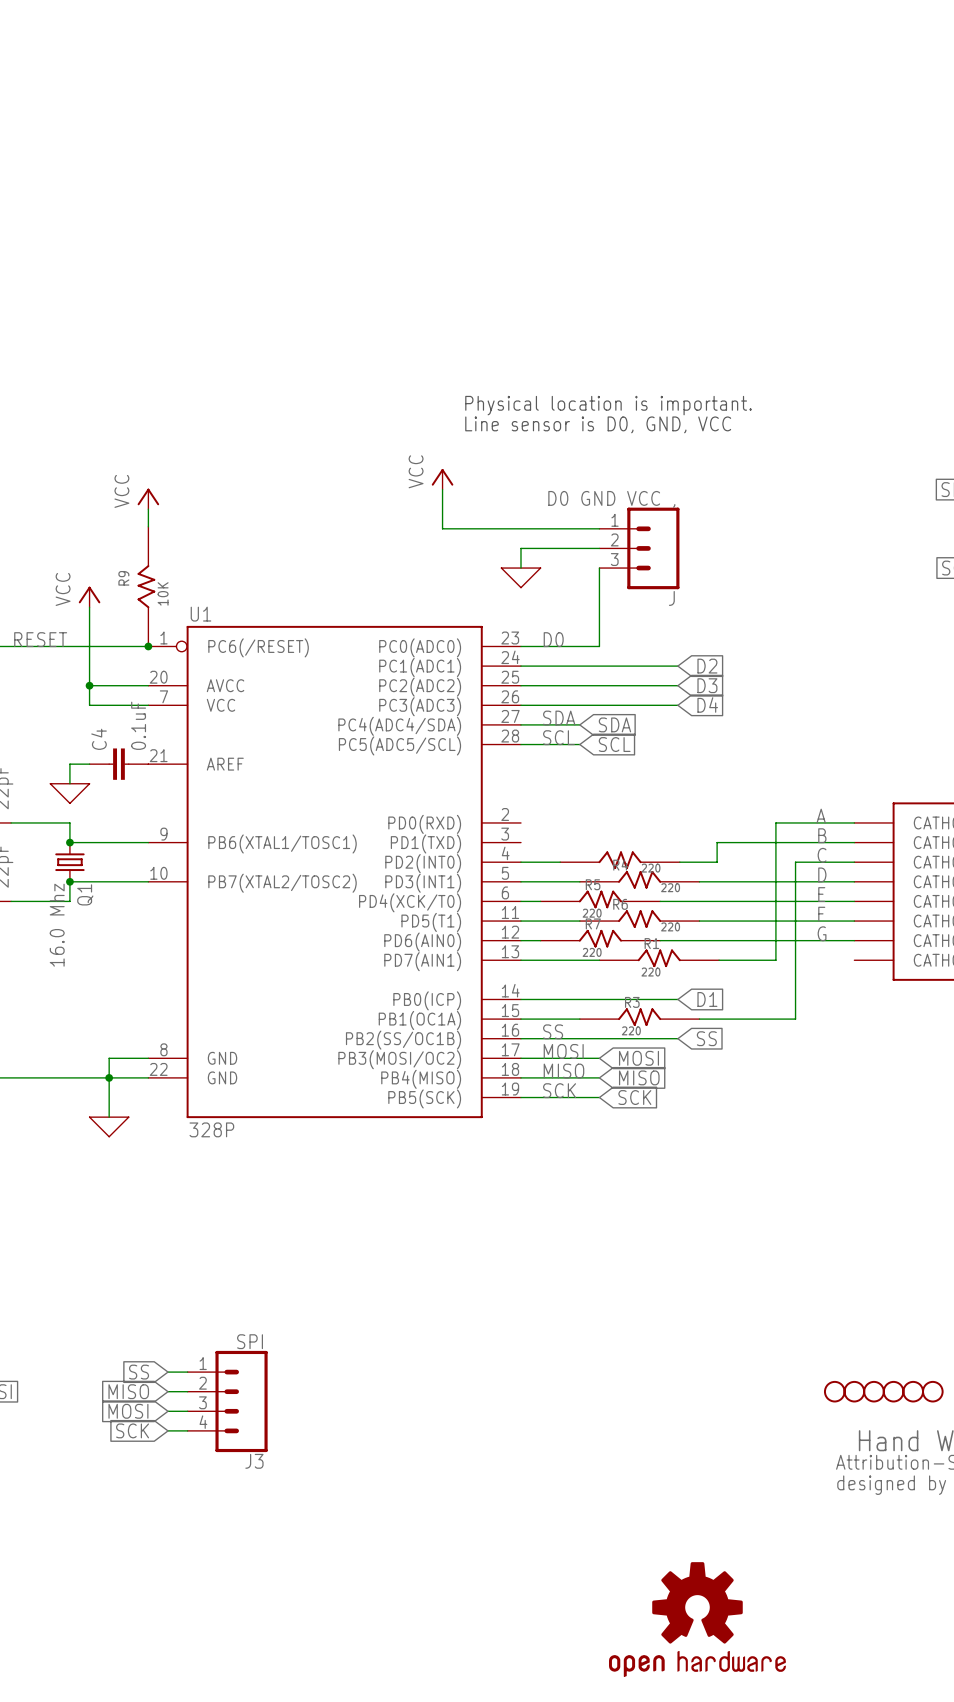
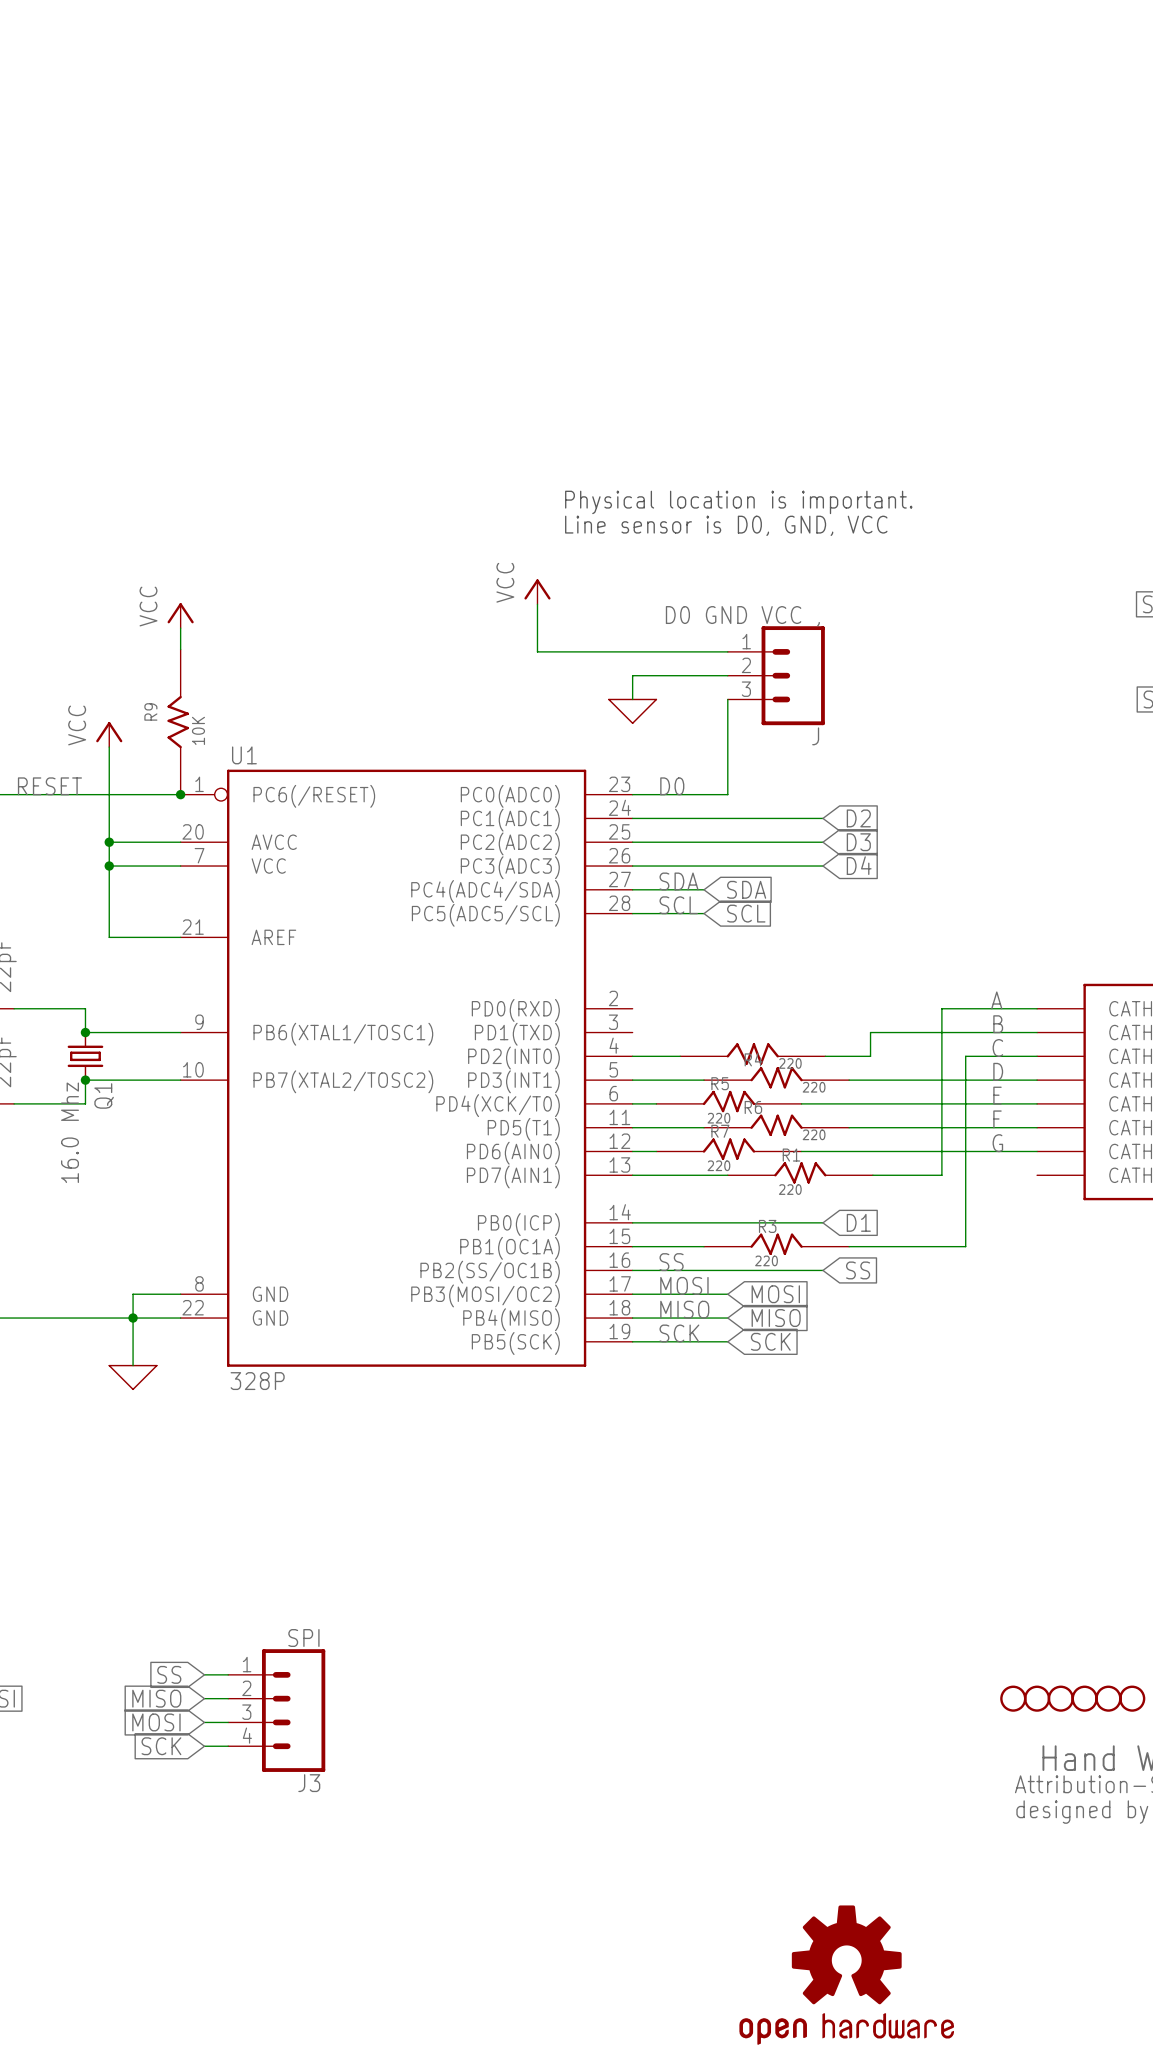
wire: none -> (109, 866) (109, 937) (180, 937)
junction: none -> (109, 866)
wire: (89, 764) (69, 764) (69, 783) -> none
C4: 0.1uF (118, 764) -> none
power symbol: (69, 793) -> none

